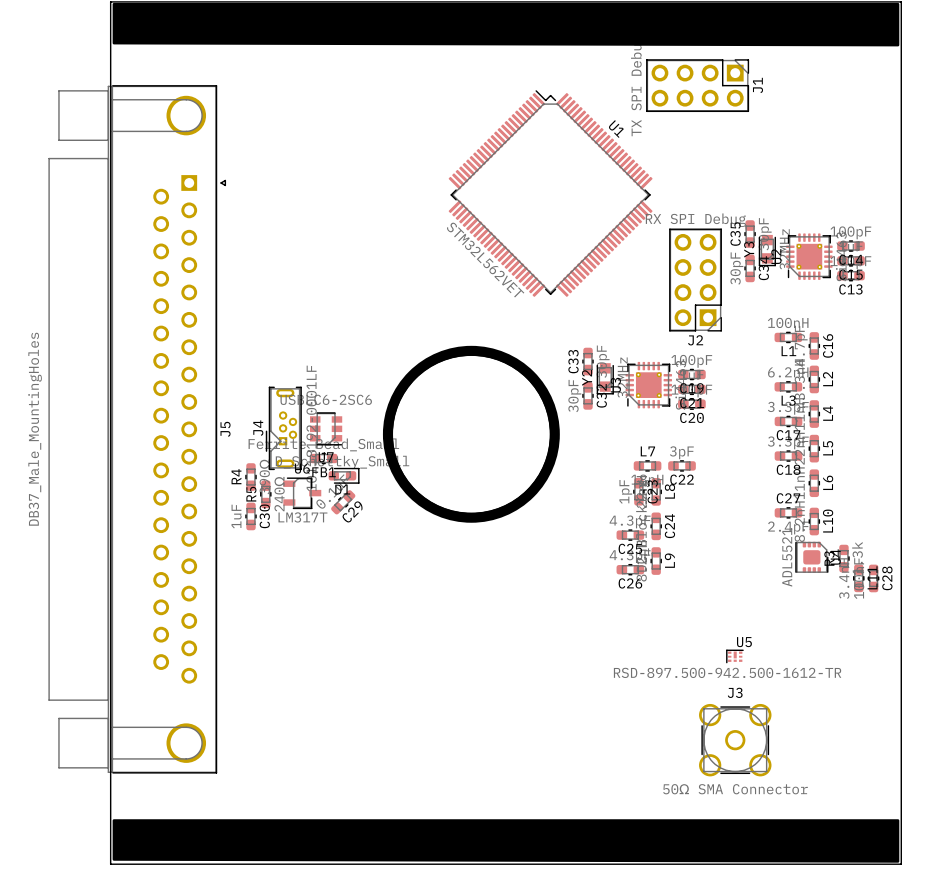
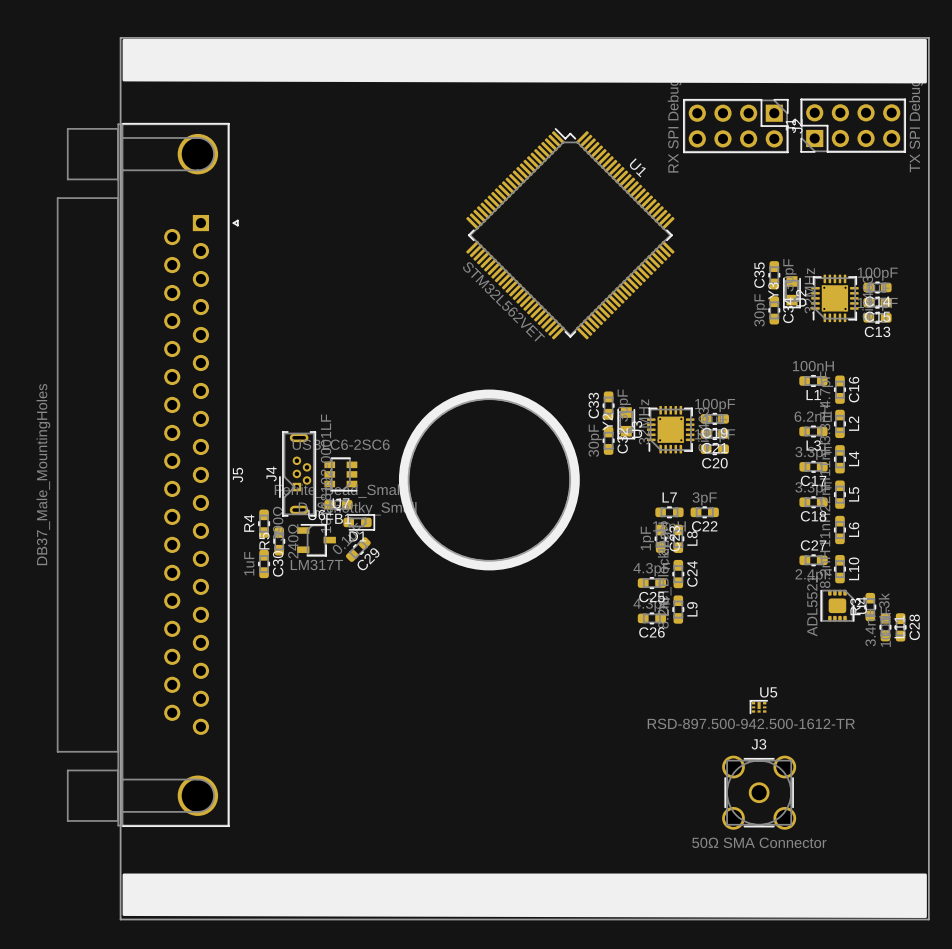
J1 rotation: 0° (697, 85) -> 180° (853, 125)
J1 position: (697, 85) -> (853, 125)
J2 rotation: 0° (695, 280) -> 90° counterclockwise (735, 126)
J2 position: (695, 280) -> (735, 126)

